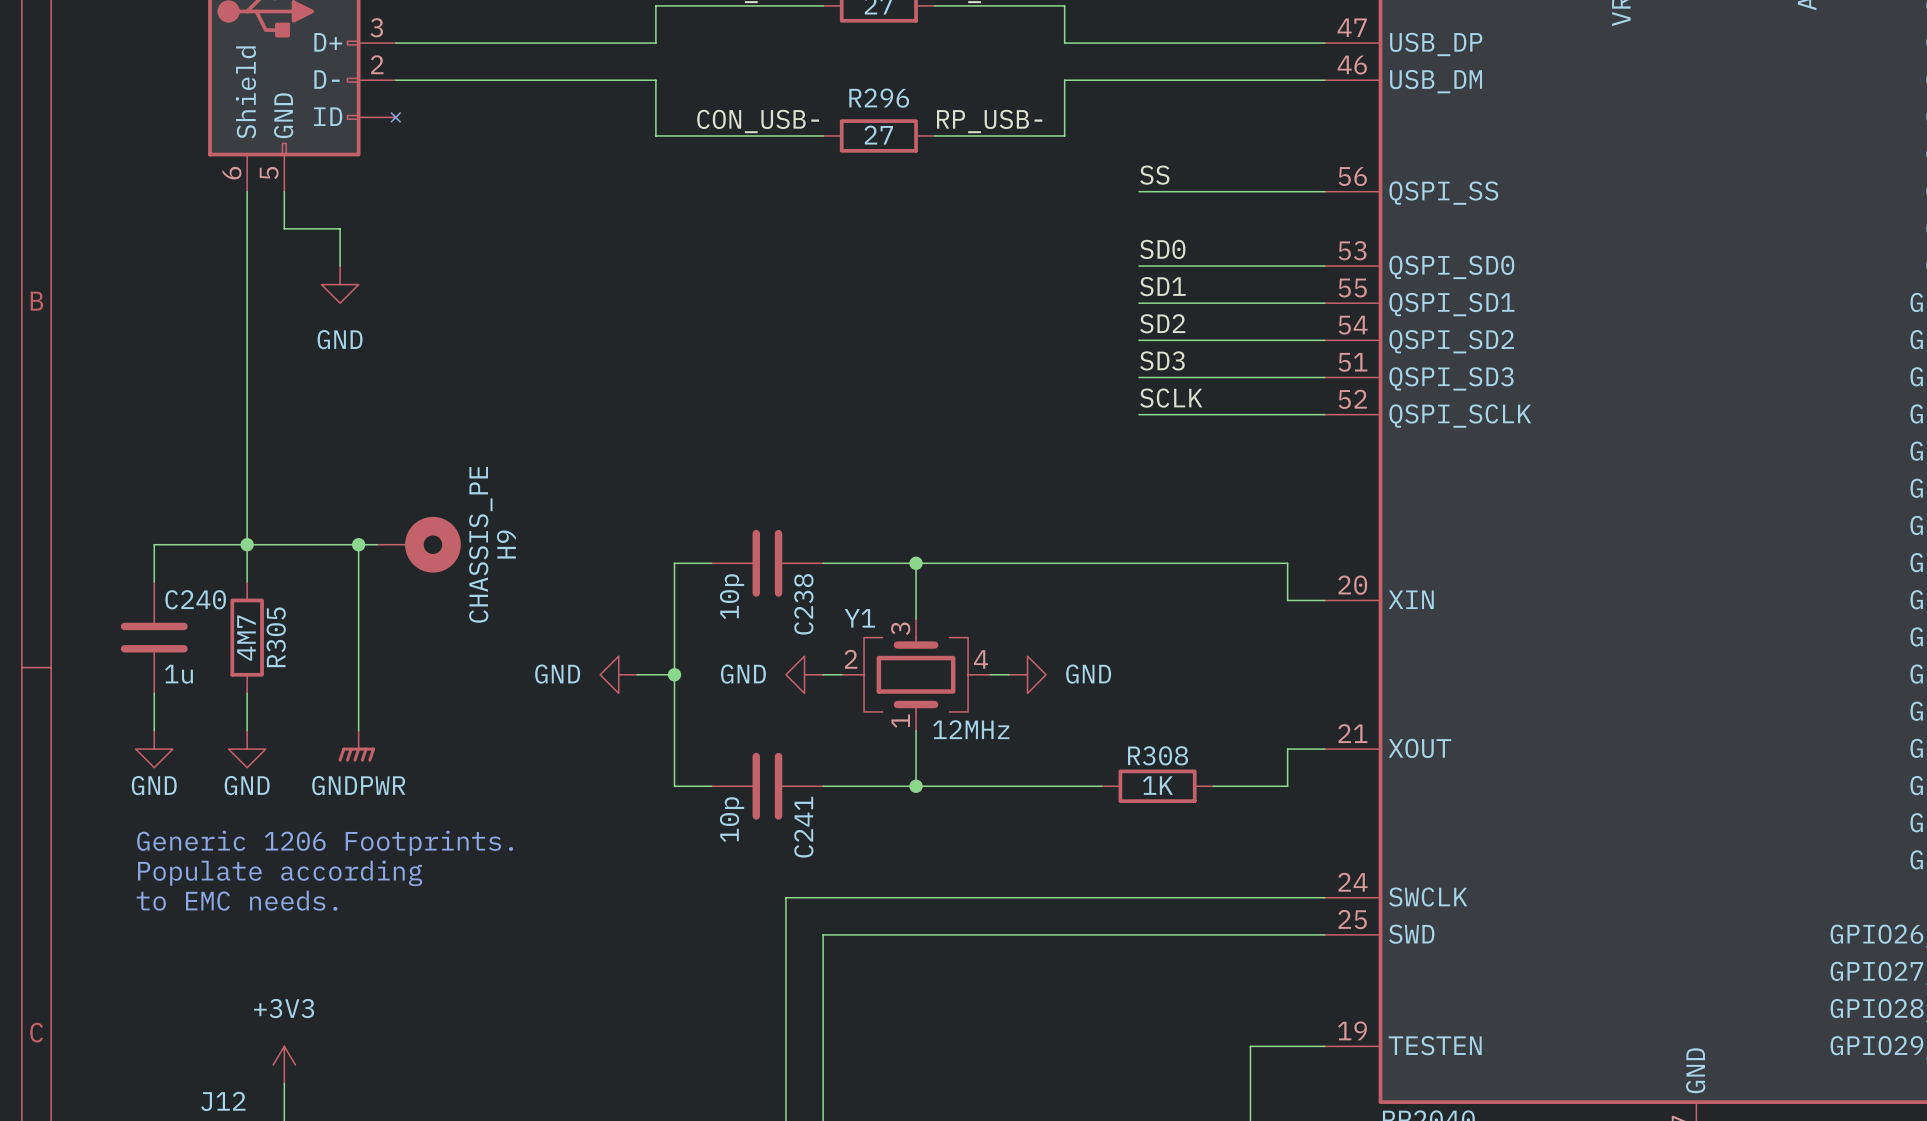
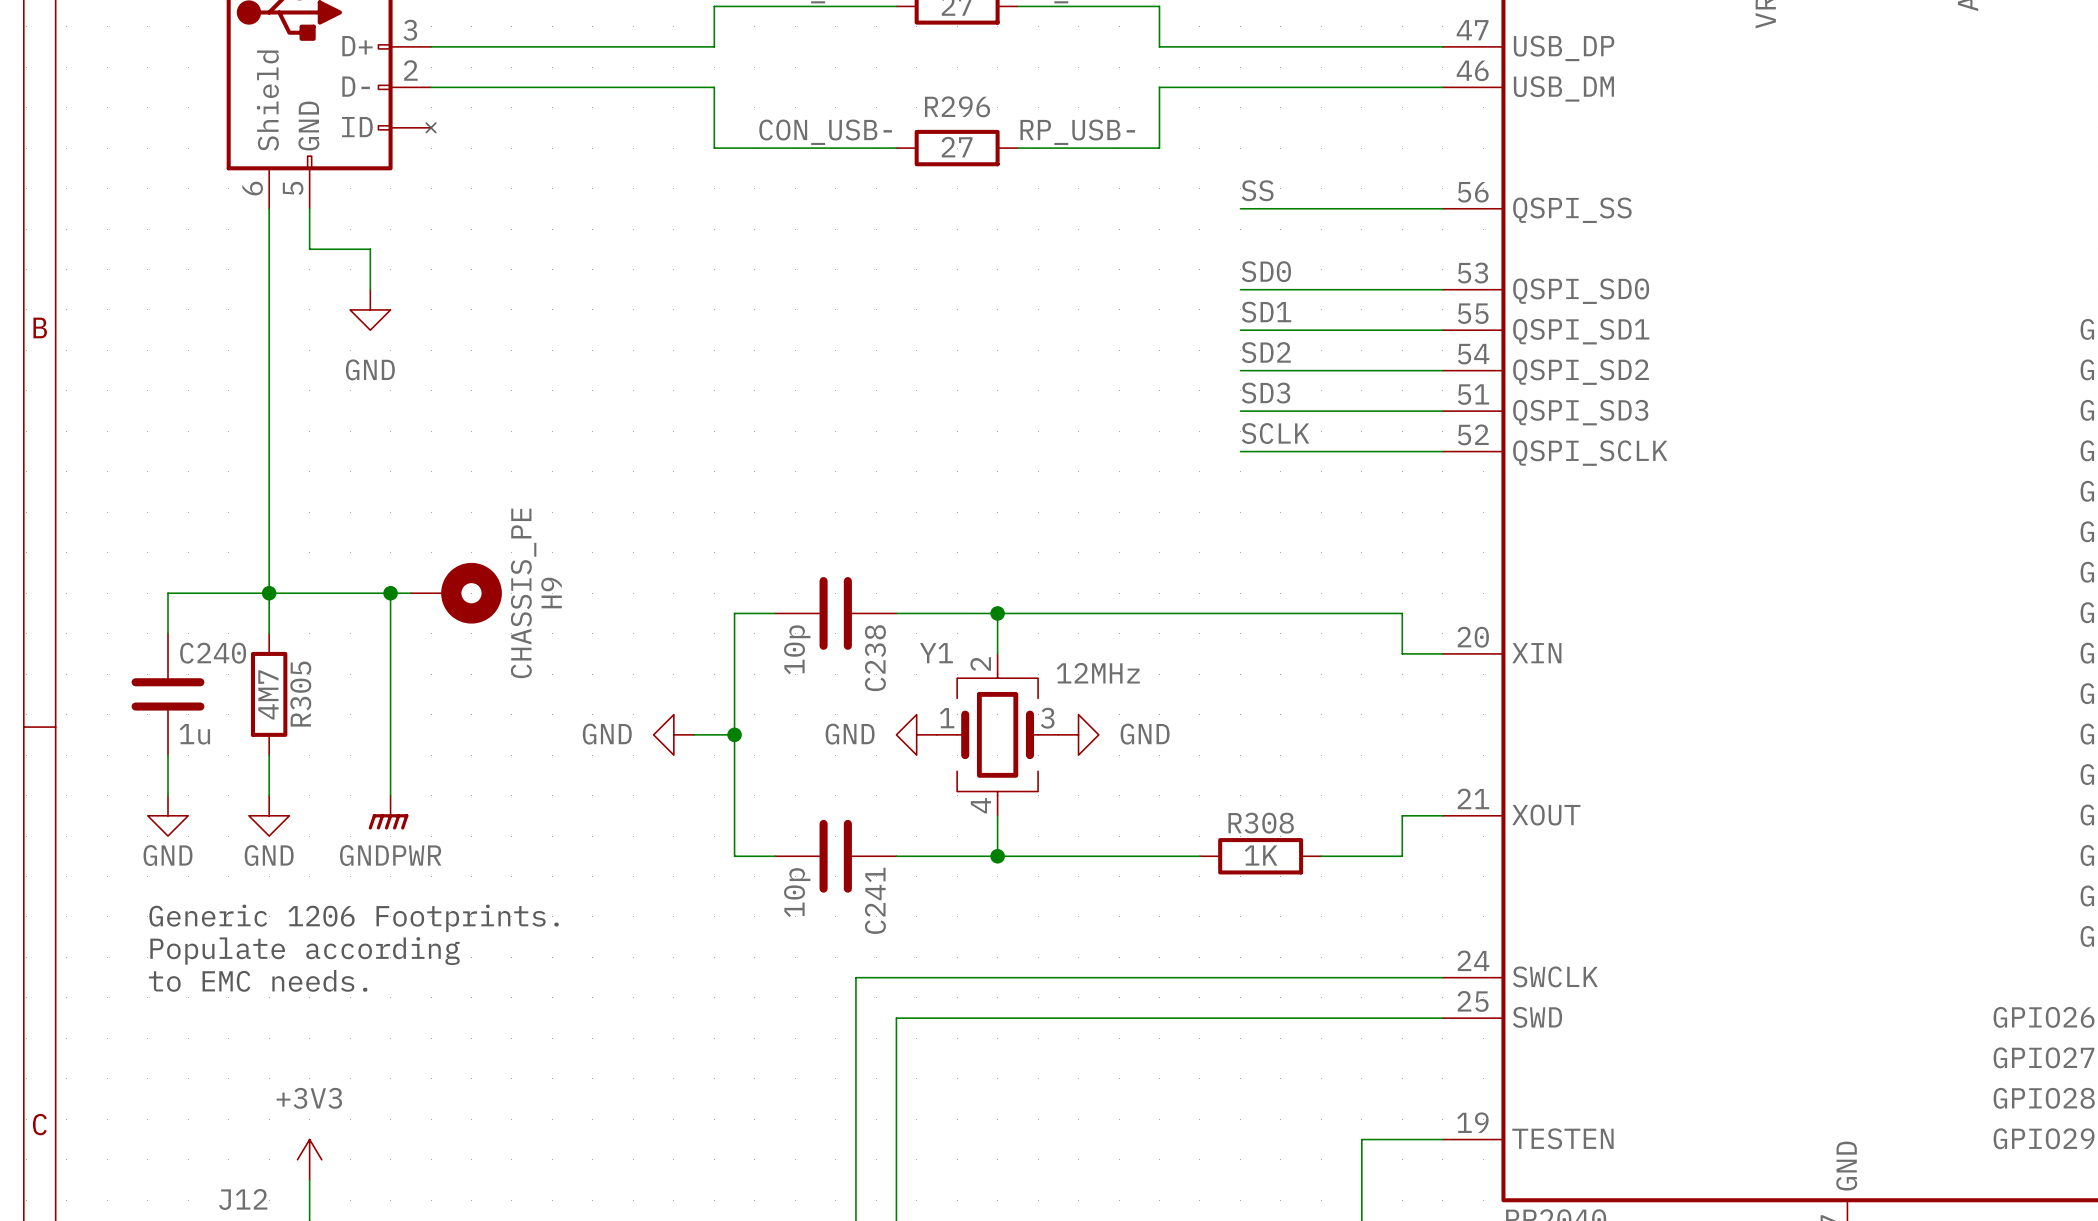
power symbol position: GND (804, 674) -> GND (916, 734)
wire: (823, 674) (841, 674) -> none
Y1 rotation: 0° (916, 674) -> 90° clockwise (997, 734)
wire: (990, 674) (1008, 674) -> none
power symbol position: GND (1027, 674) -> GND (1078, 734)
Y1 value position: 12MHz (971, 729) -> 12MHz (1098, 673)

